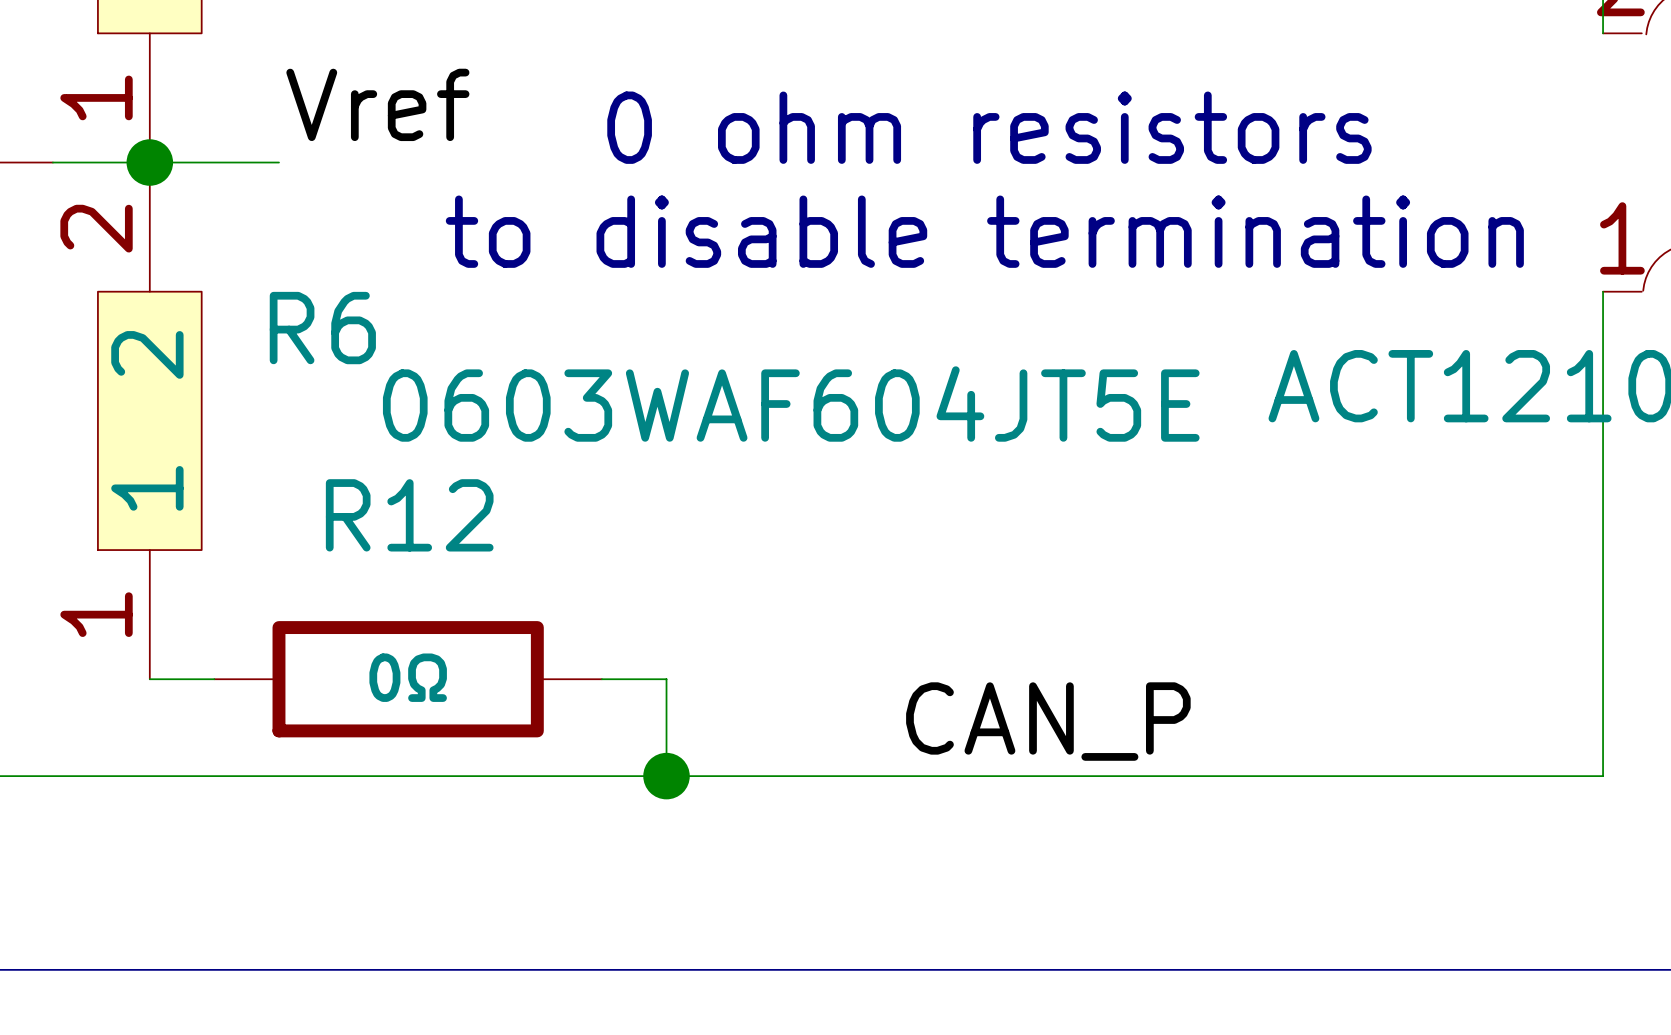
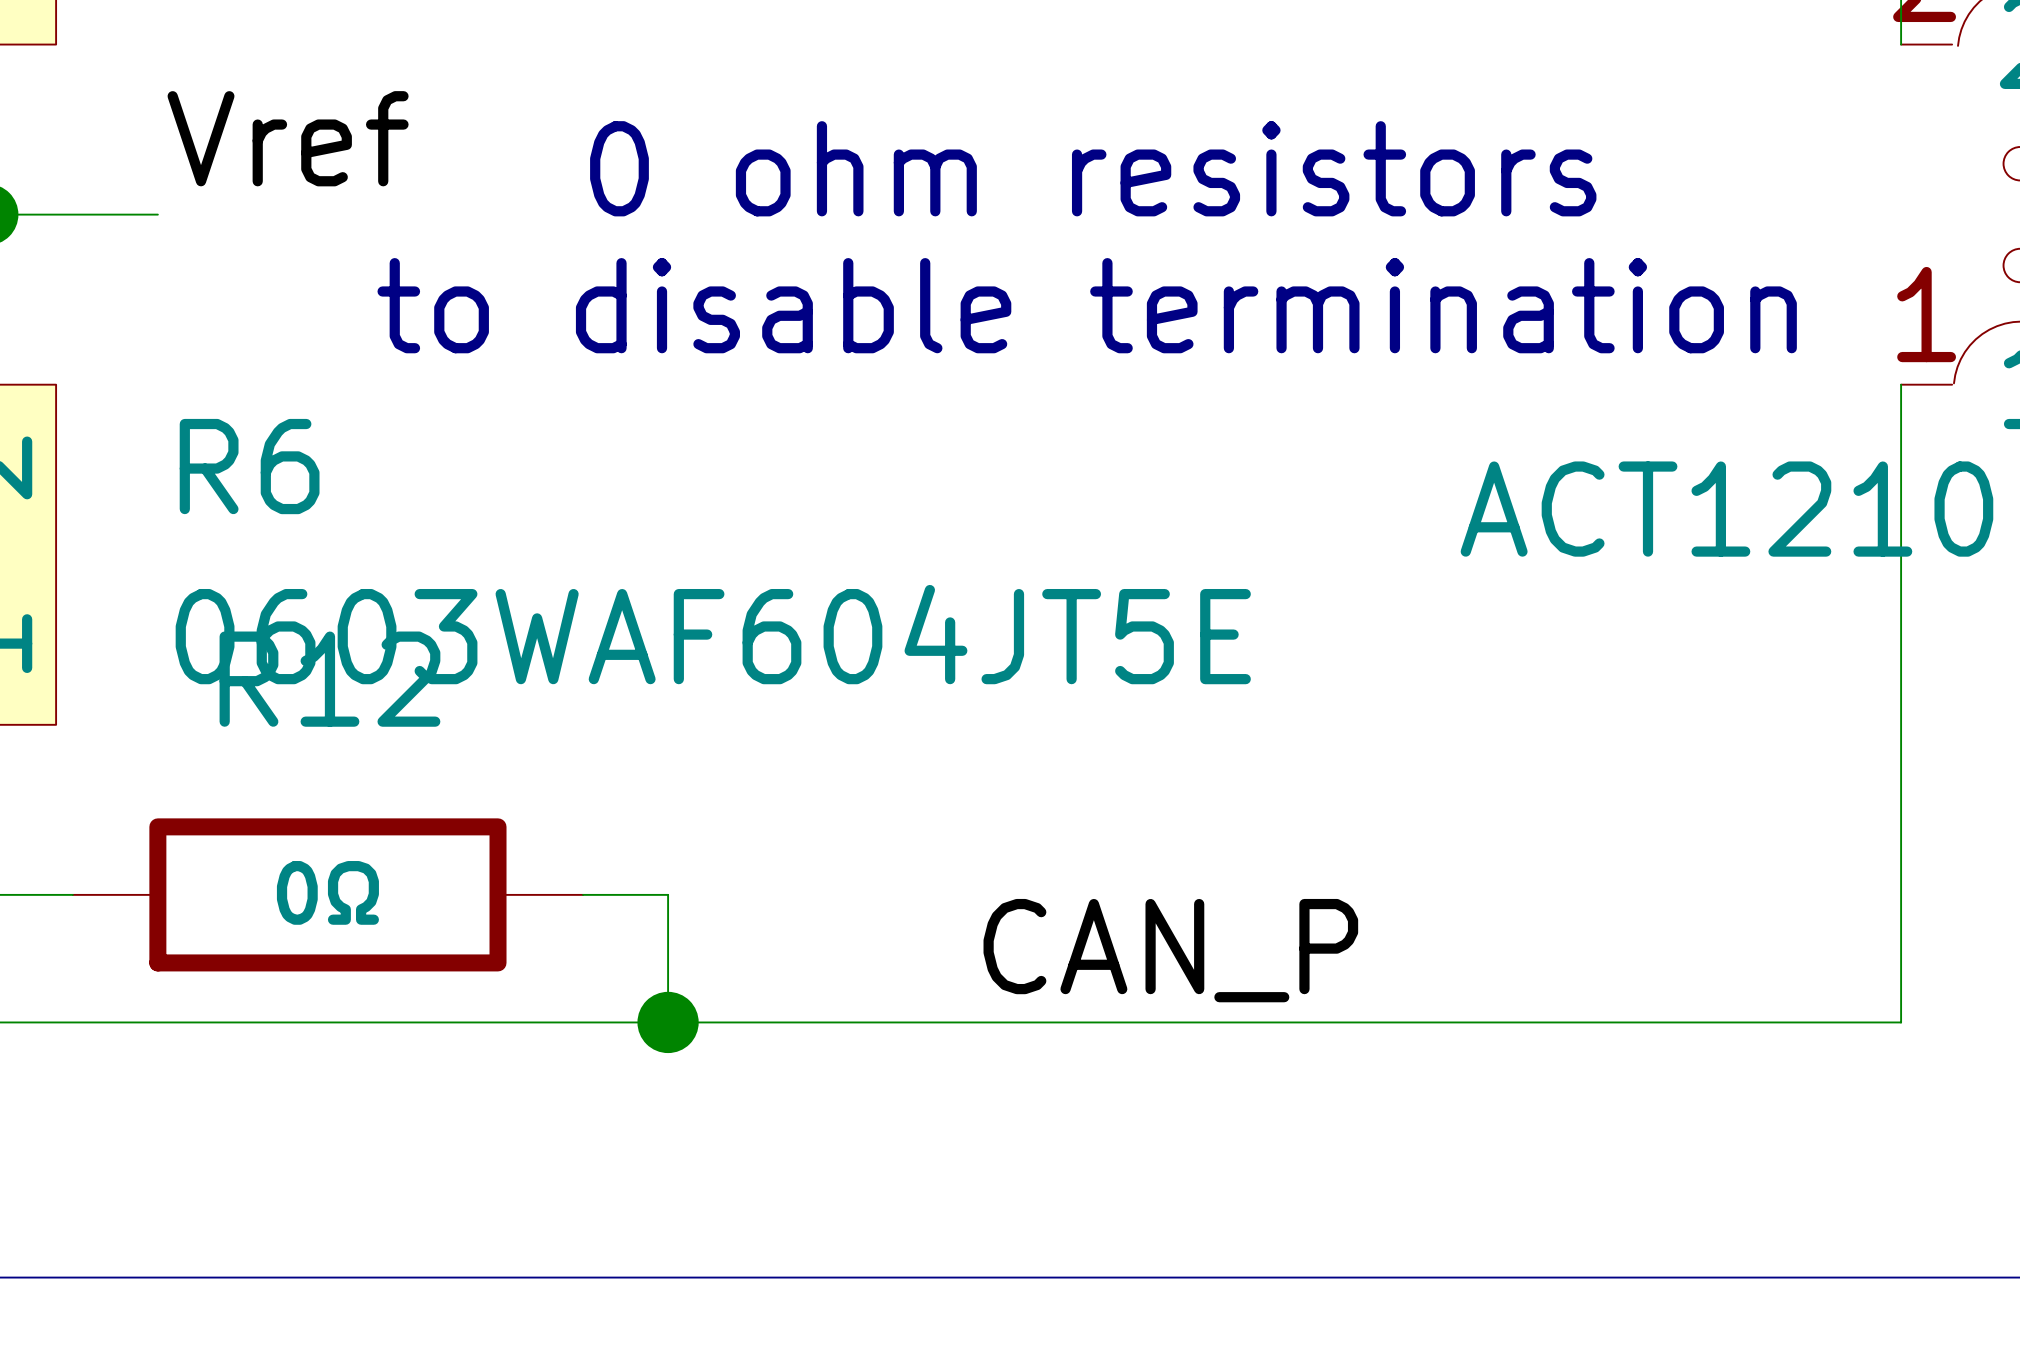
R6 name position: R6 (322, 328) -> R6 (249, 466)
R6 value position: 0603WAF604JT5E (791, 404) -> 0603WAF604JT5E (713, 634)

